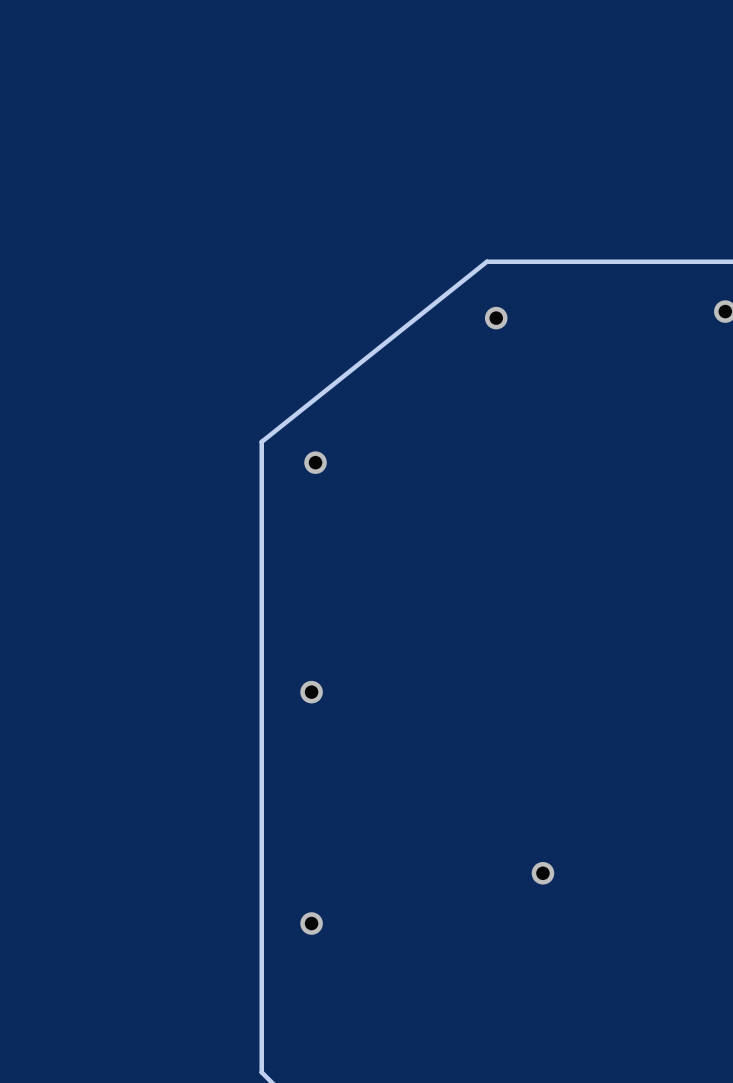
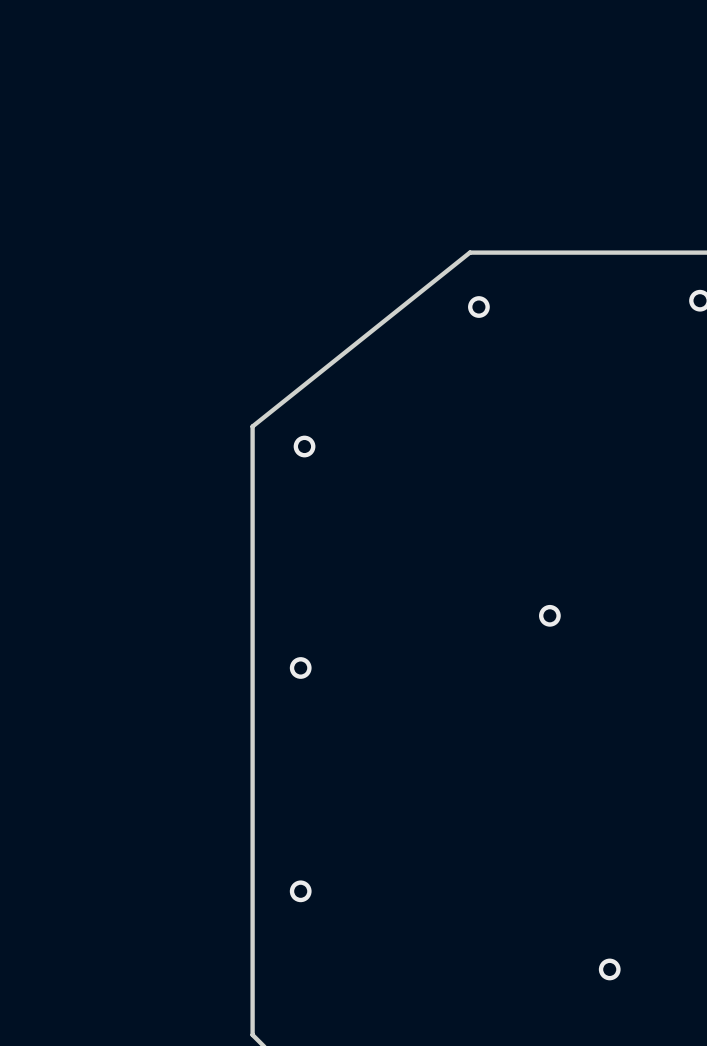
via: none -> (549, 615)
via: (542, 873) -> none
via: none -> (609, 969)

